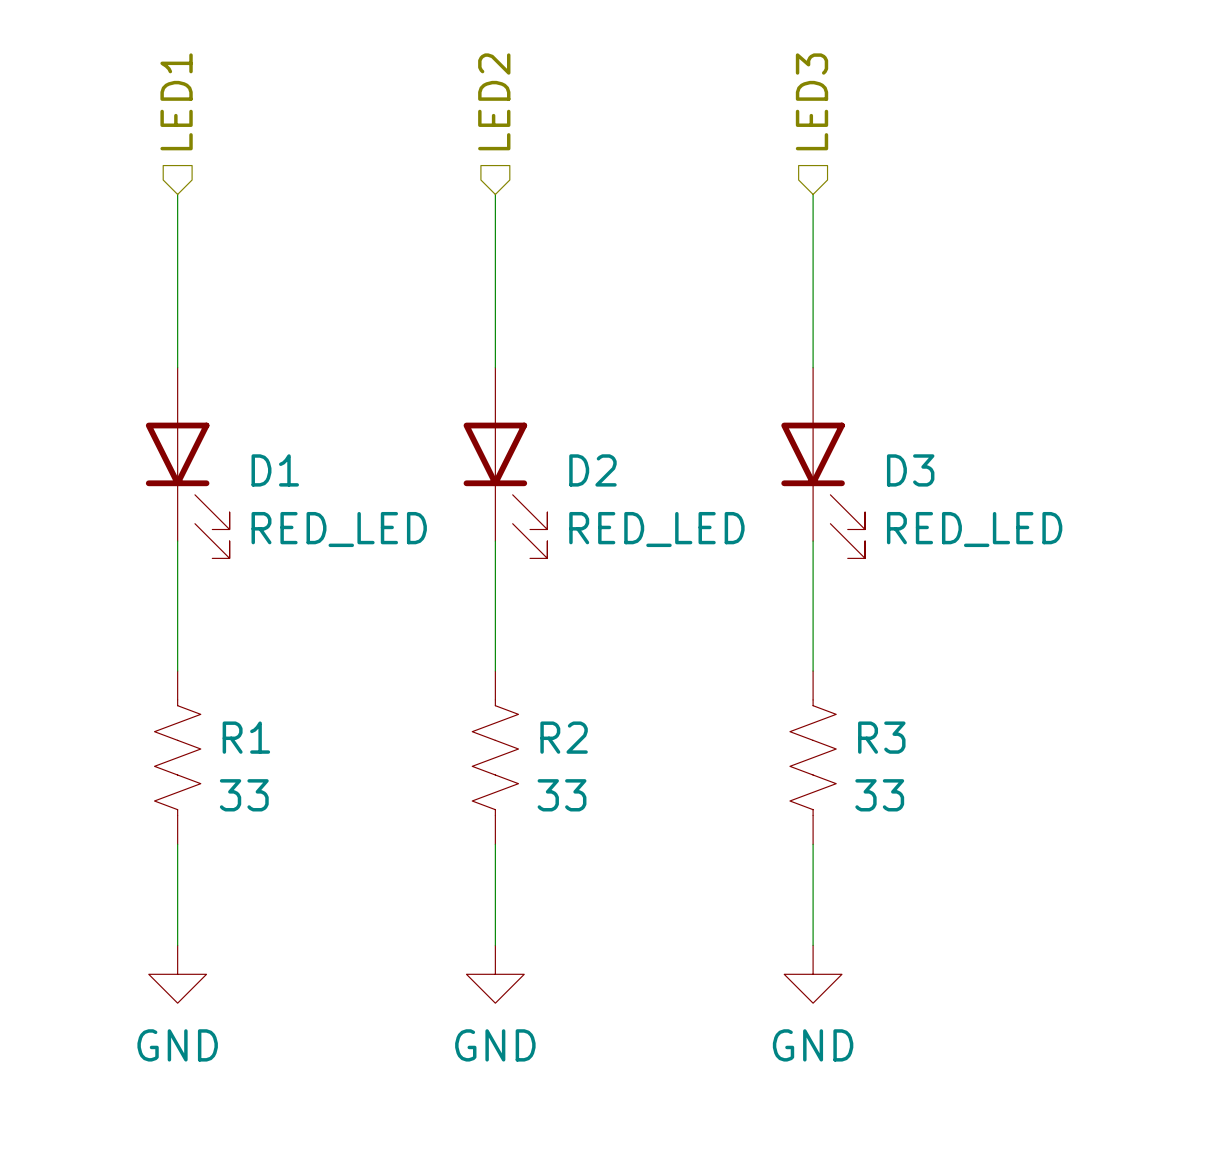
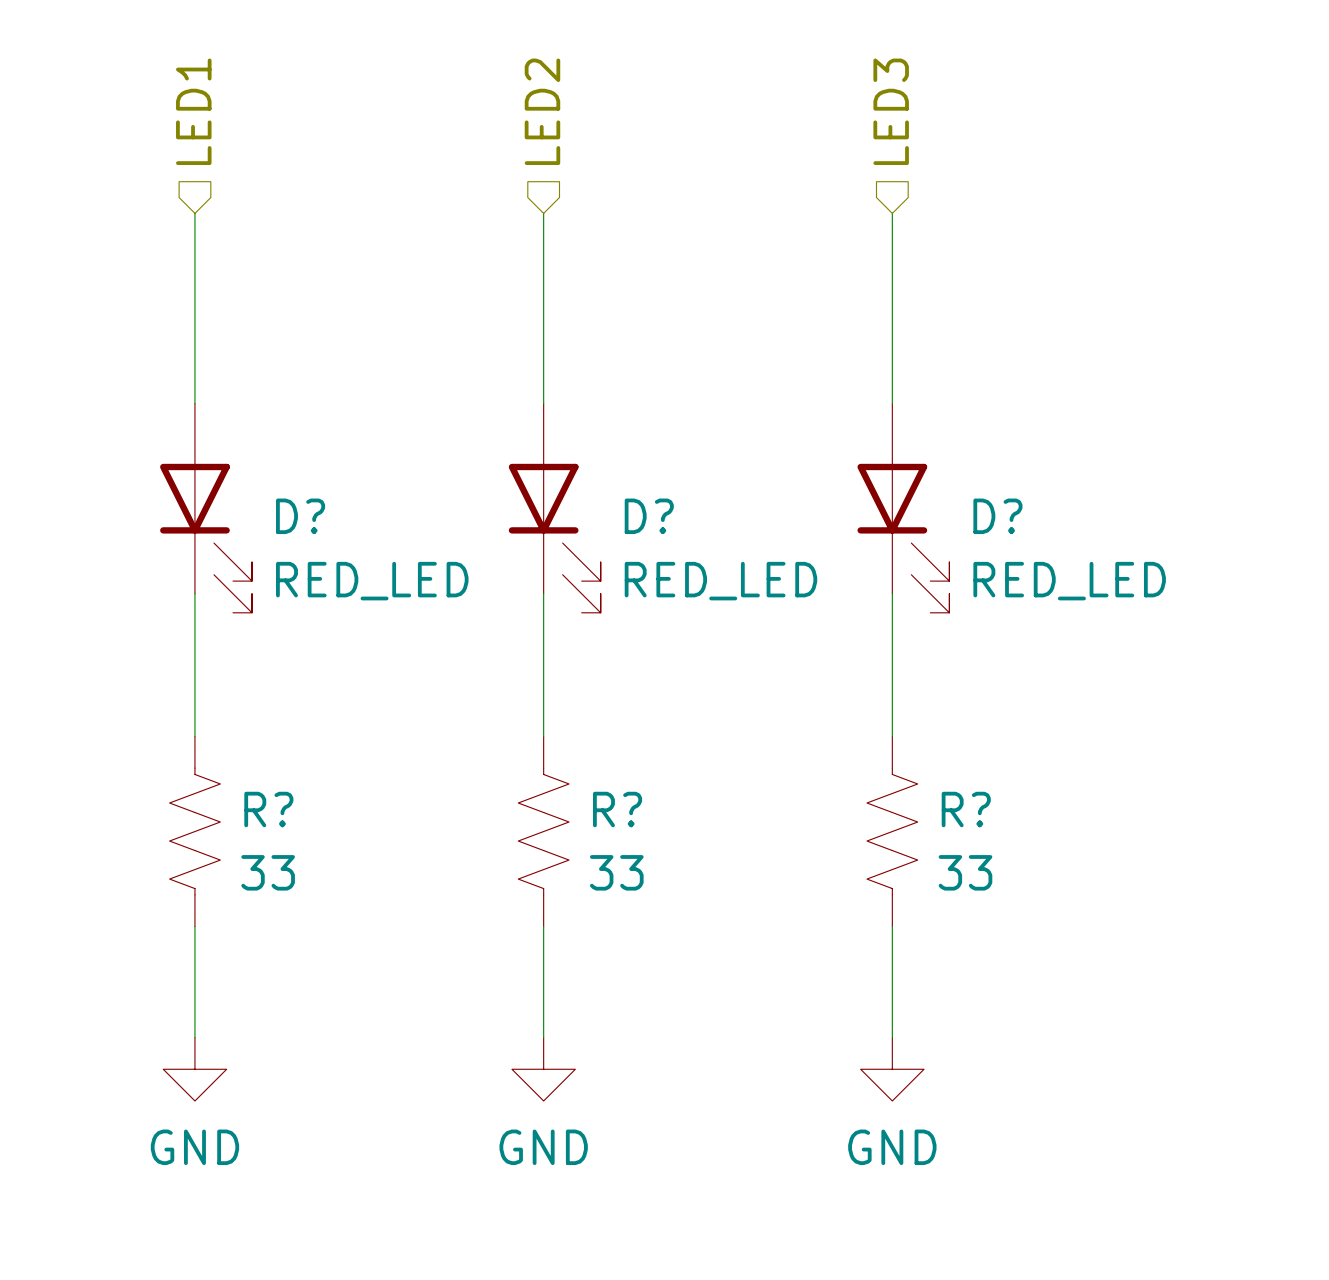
D1 name: D1 (275, 470) -> D? (300, 516)
D2 name: D2 (592, 470) -> D? (649, 516)
D3 name: D3 (910, 470) -> D? (997, 516)
R1 name: R1 (246, 737) -> R? (268, 809)
R2 name: R2 (564, 737) -> R? (617, 809)
R3 name: R3 (881, 737) -> R? (966, 809)

